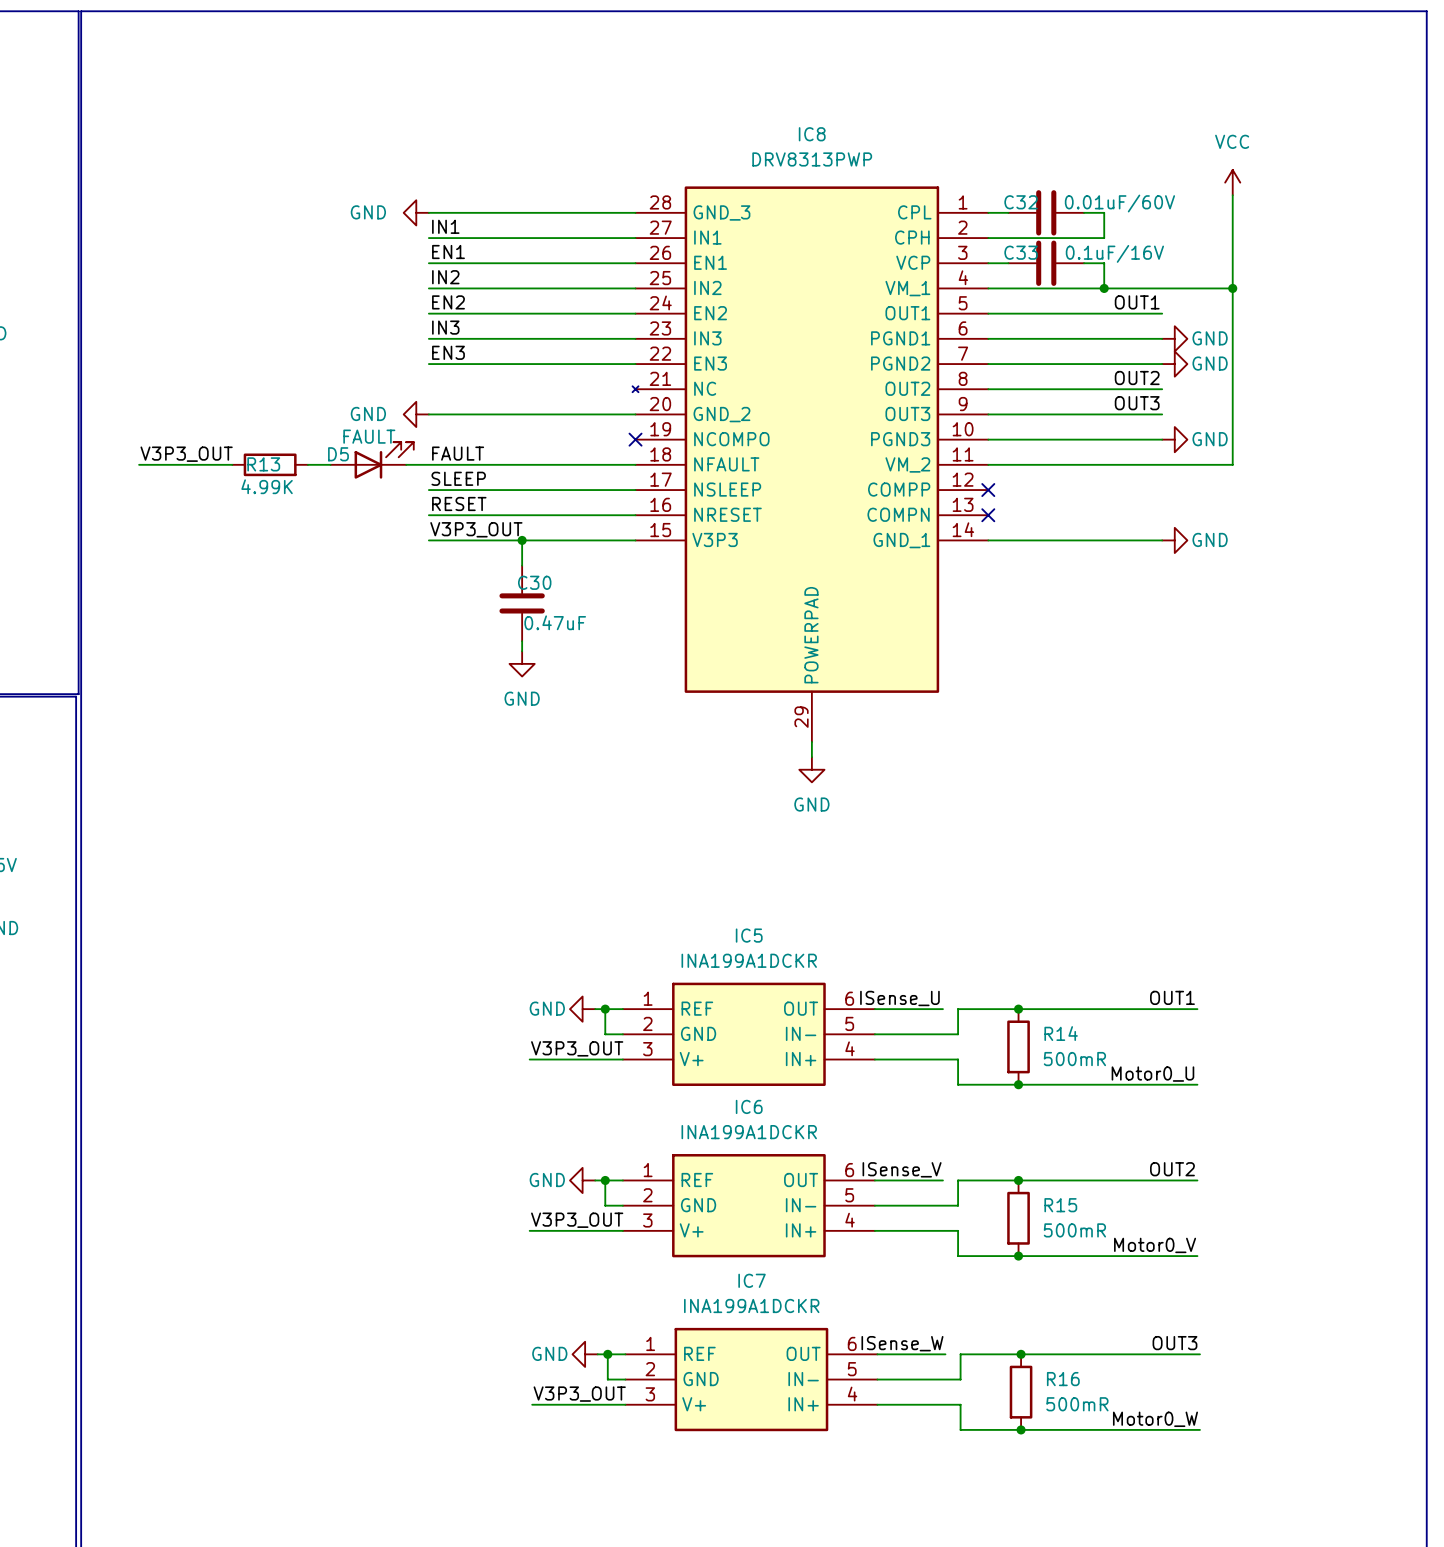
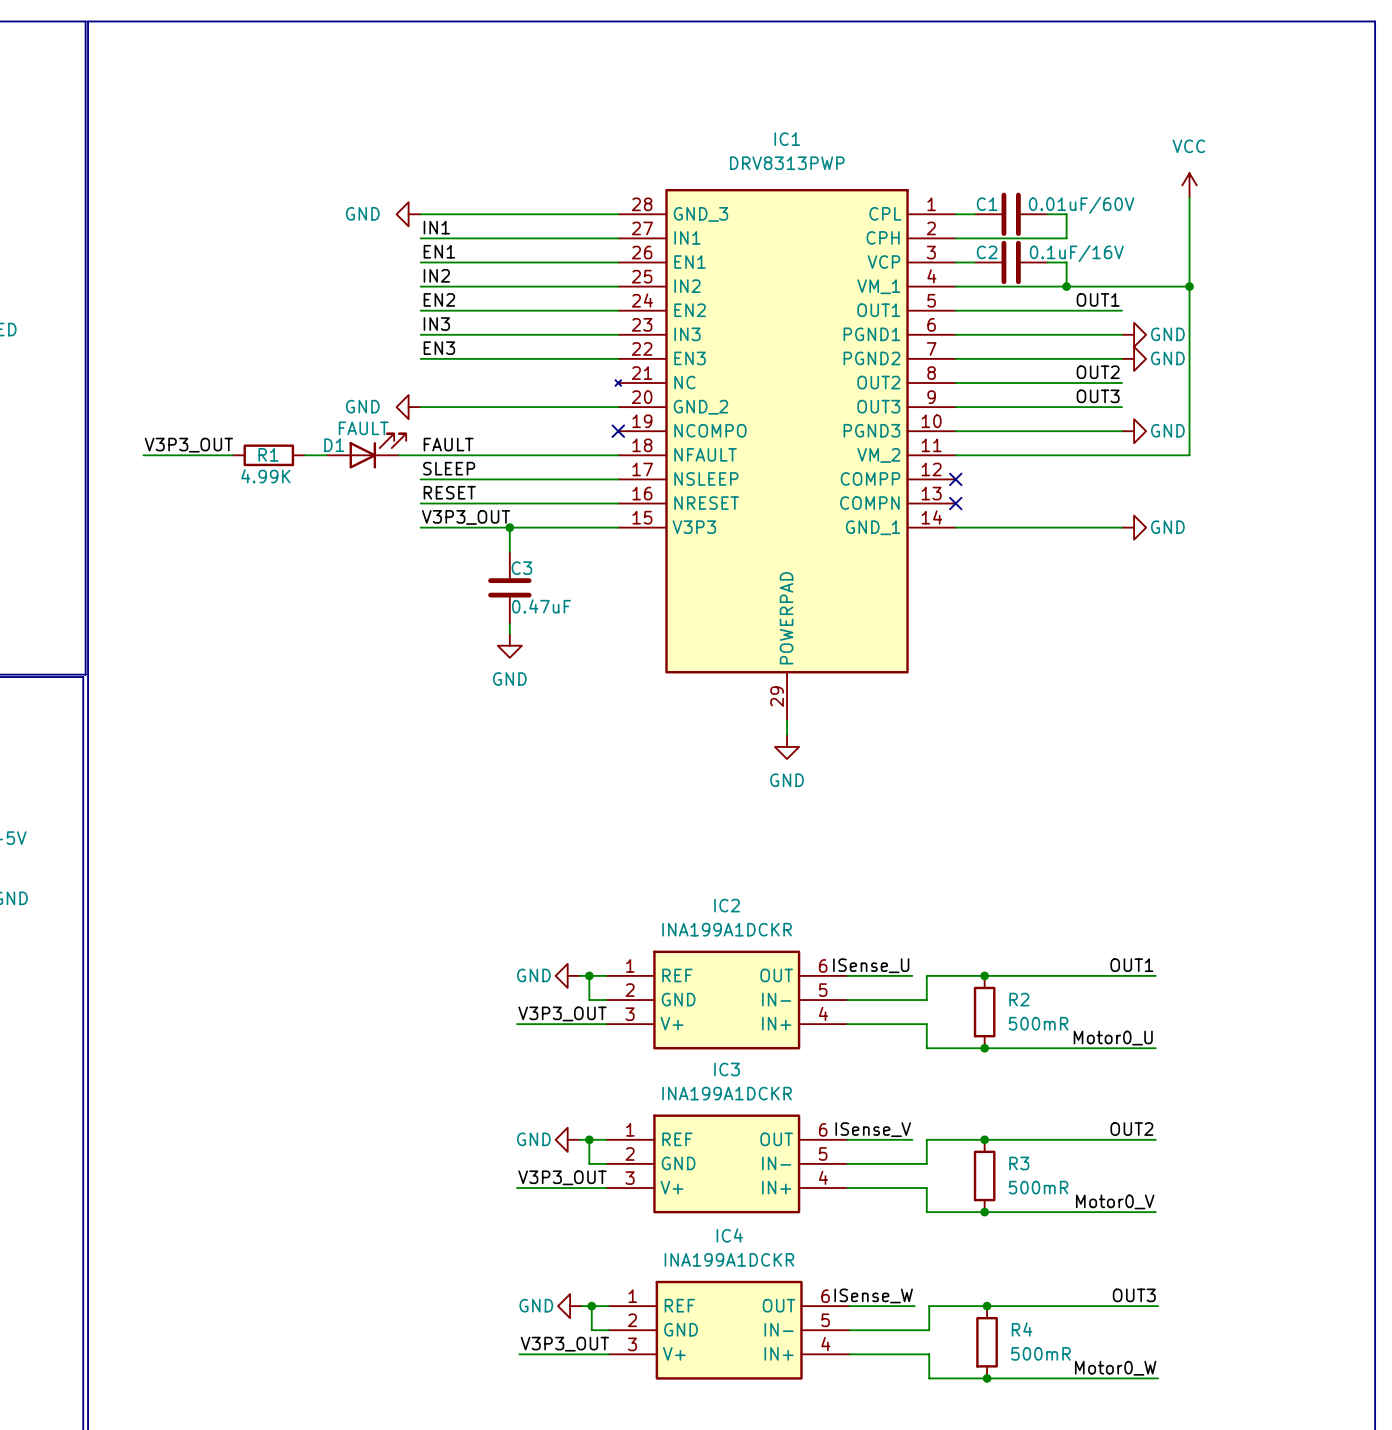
IC8 name: IC8 (812, 134) -> IC1 (787, 139)
C32 name: C32 (1021, 202) -> C1 (987, 204)
C33 name: C33 (1021, 252) -> C2 (987, 252)
D5 name: D5 (338, 454) -> D1 (334, 445)
R13 name: R13 (263, 464) -> R1 (268, 454)
C30 name: C30 (534, 582) -> C3 (521, 568)
IC5 name: IC5 (749, 935) -> IC2 (727, 905)
R14 name: R14 (1061, 1033) -> R2 (1019, 999)
IC6 name: IC6 (749, 1106) -> IC3 (727, 1069)
R15 name: R15 (1060, 1205) -> R3 (1019, 1163)
IC7 name: IC7 (752, 1280) -> IC4 (729, 1235)
R16 name: R16 (1063, 1379) -> R4 (1022, 1329)

